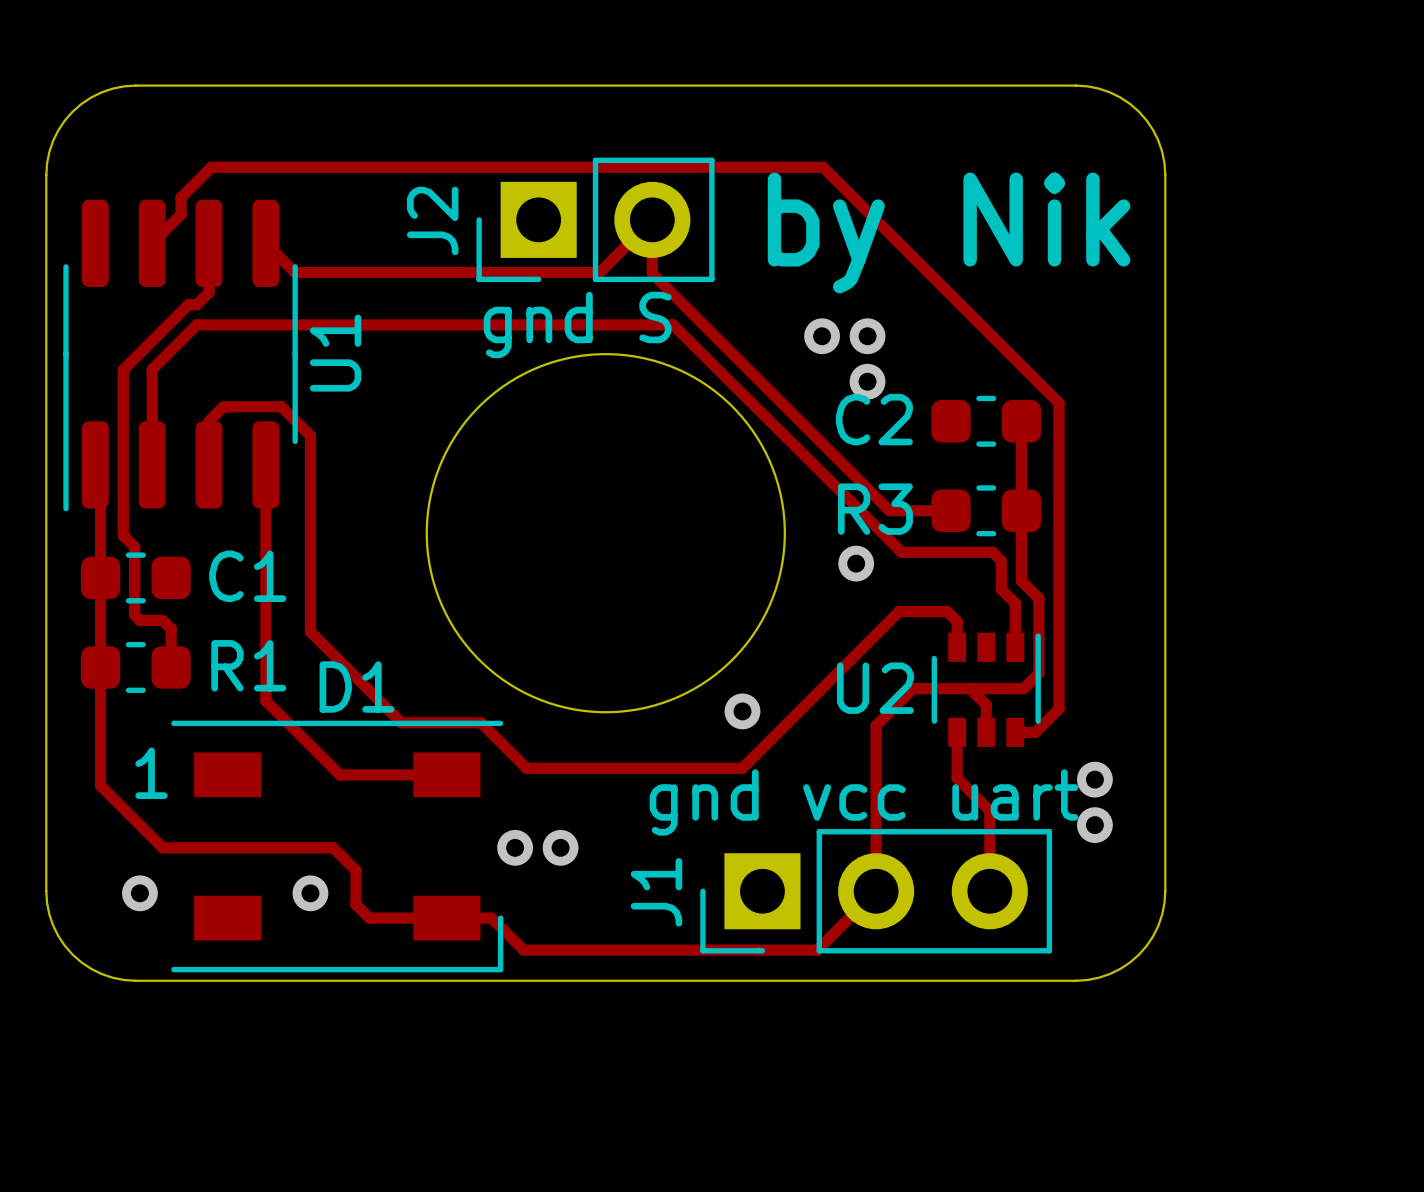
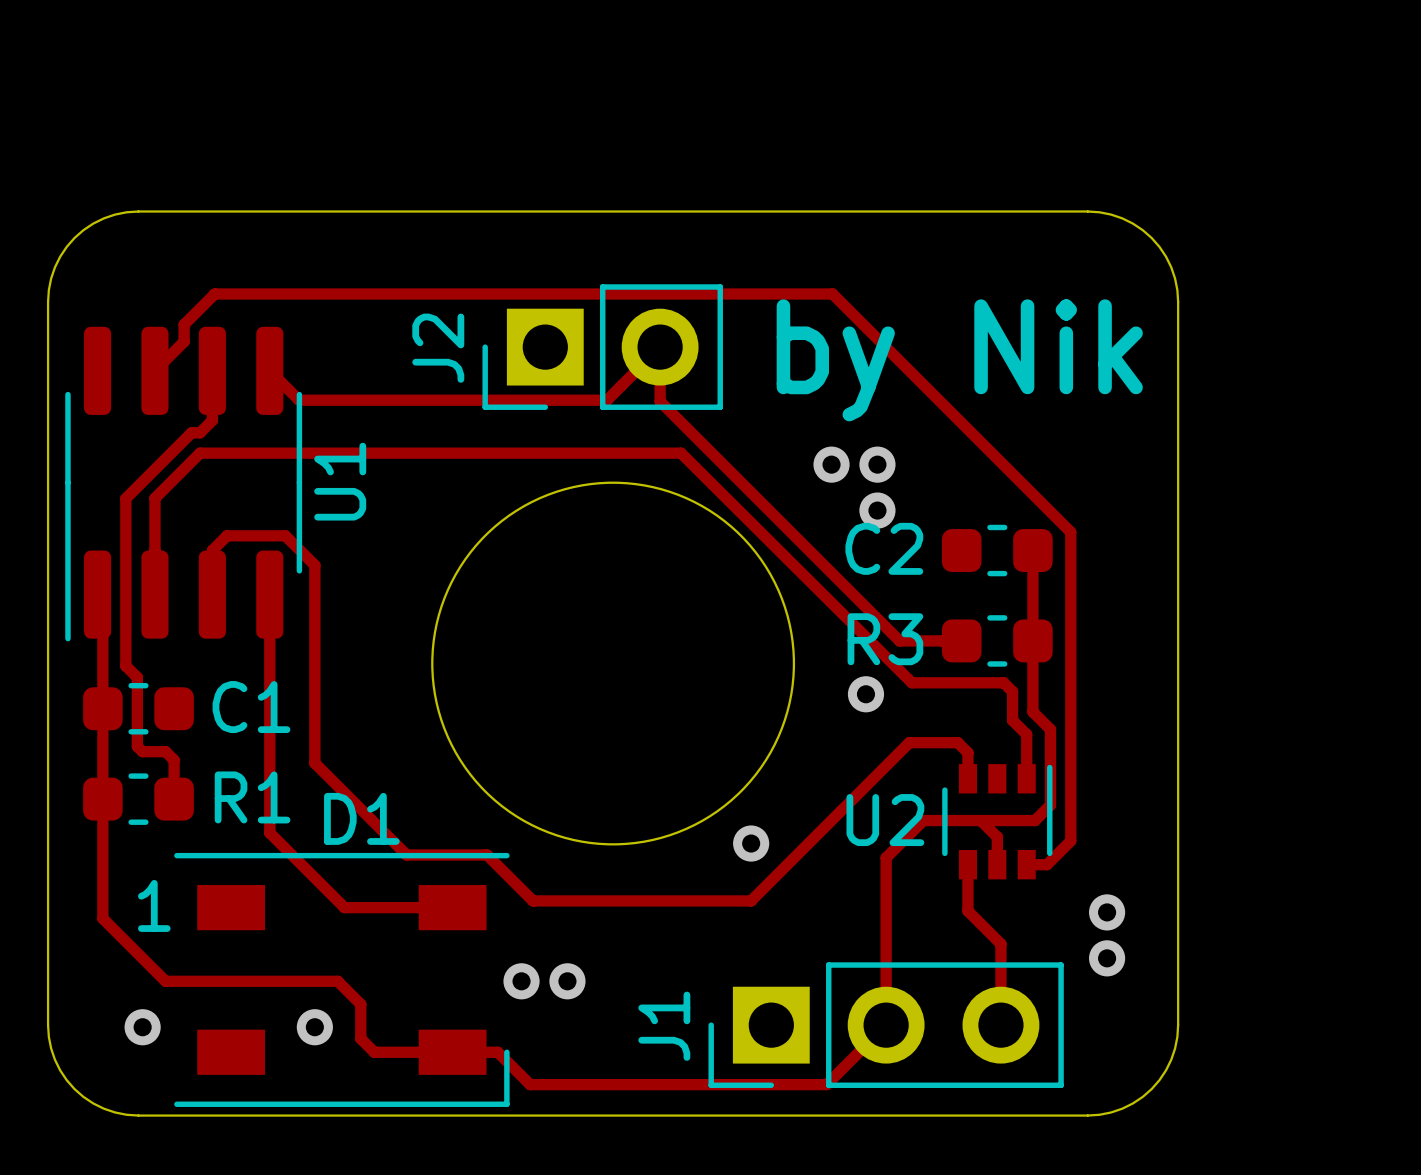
text: gnd S (577, 324) -> none
text: gnd vcc uart (864, 802) -> none

